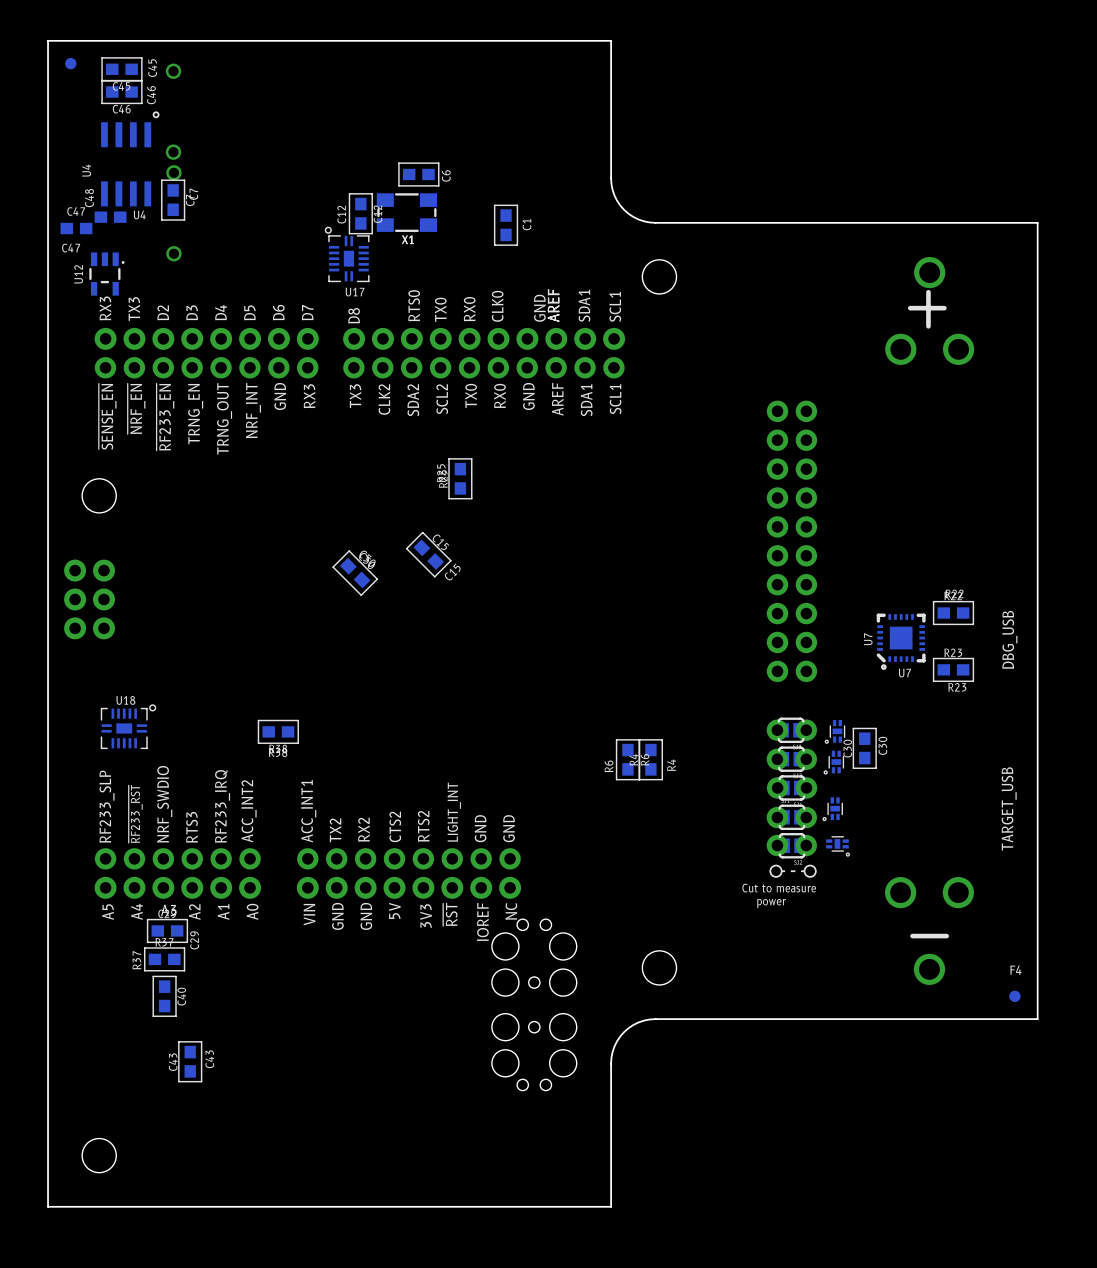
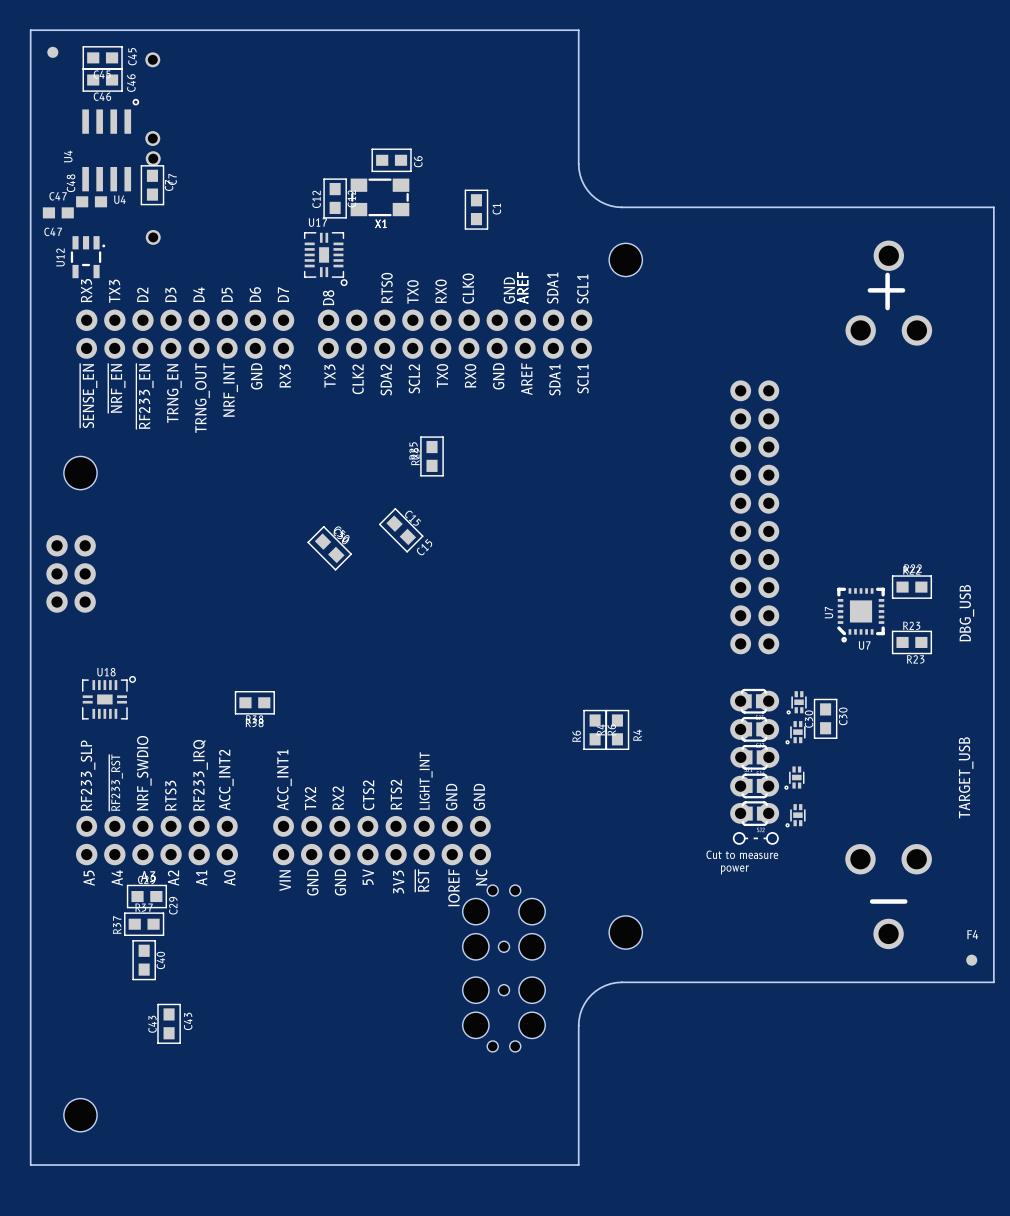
U17 rotation: 0° (347, 254) -> 180° (325, 259)
part rotation: 0° (837, 846) -> 90° clockwise (795, 815)

